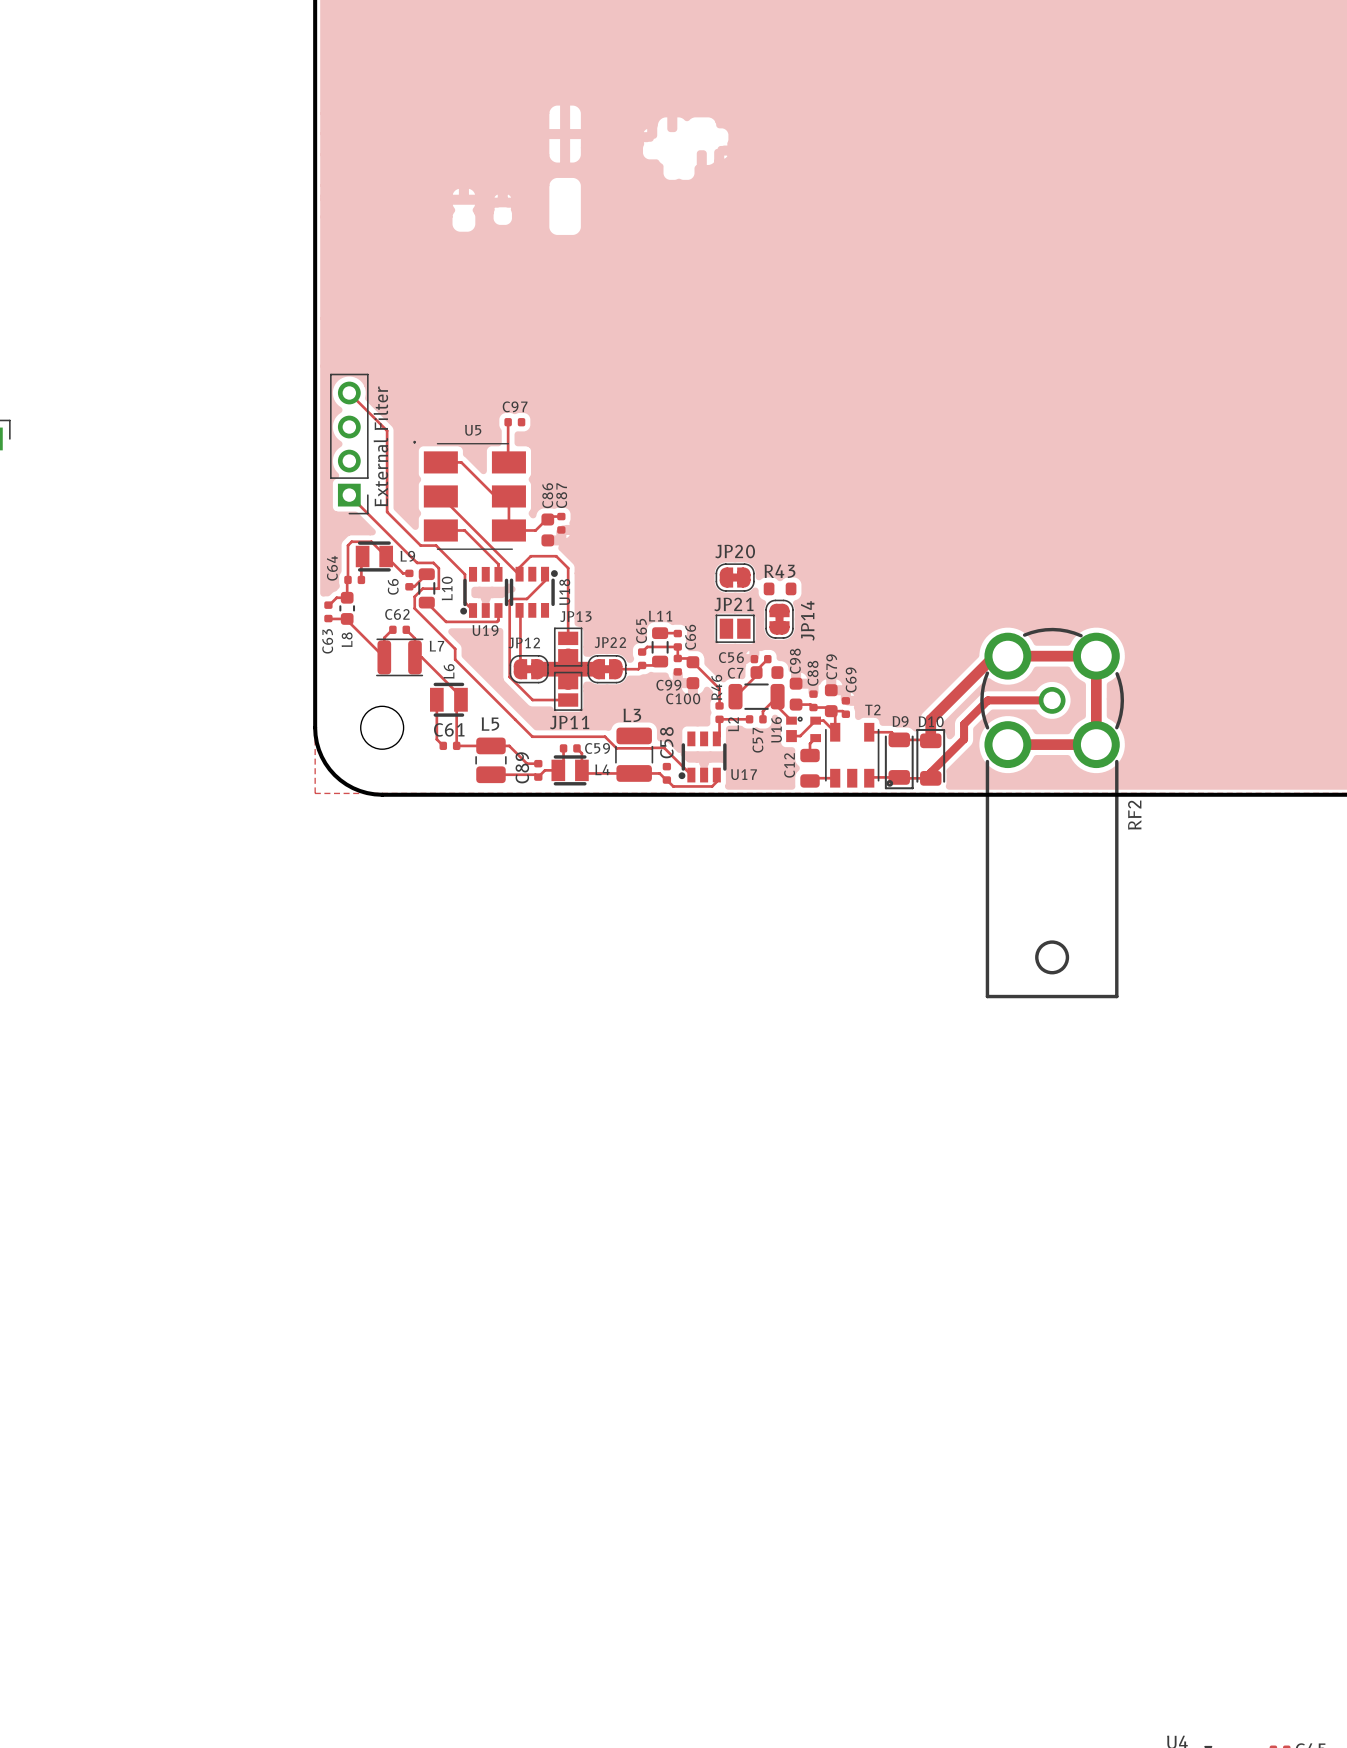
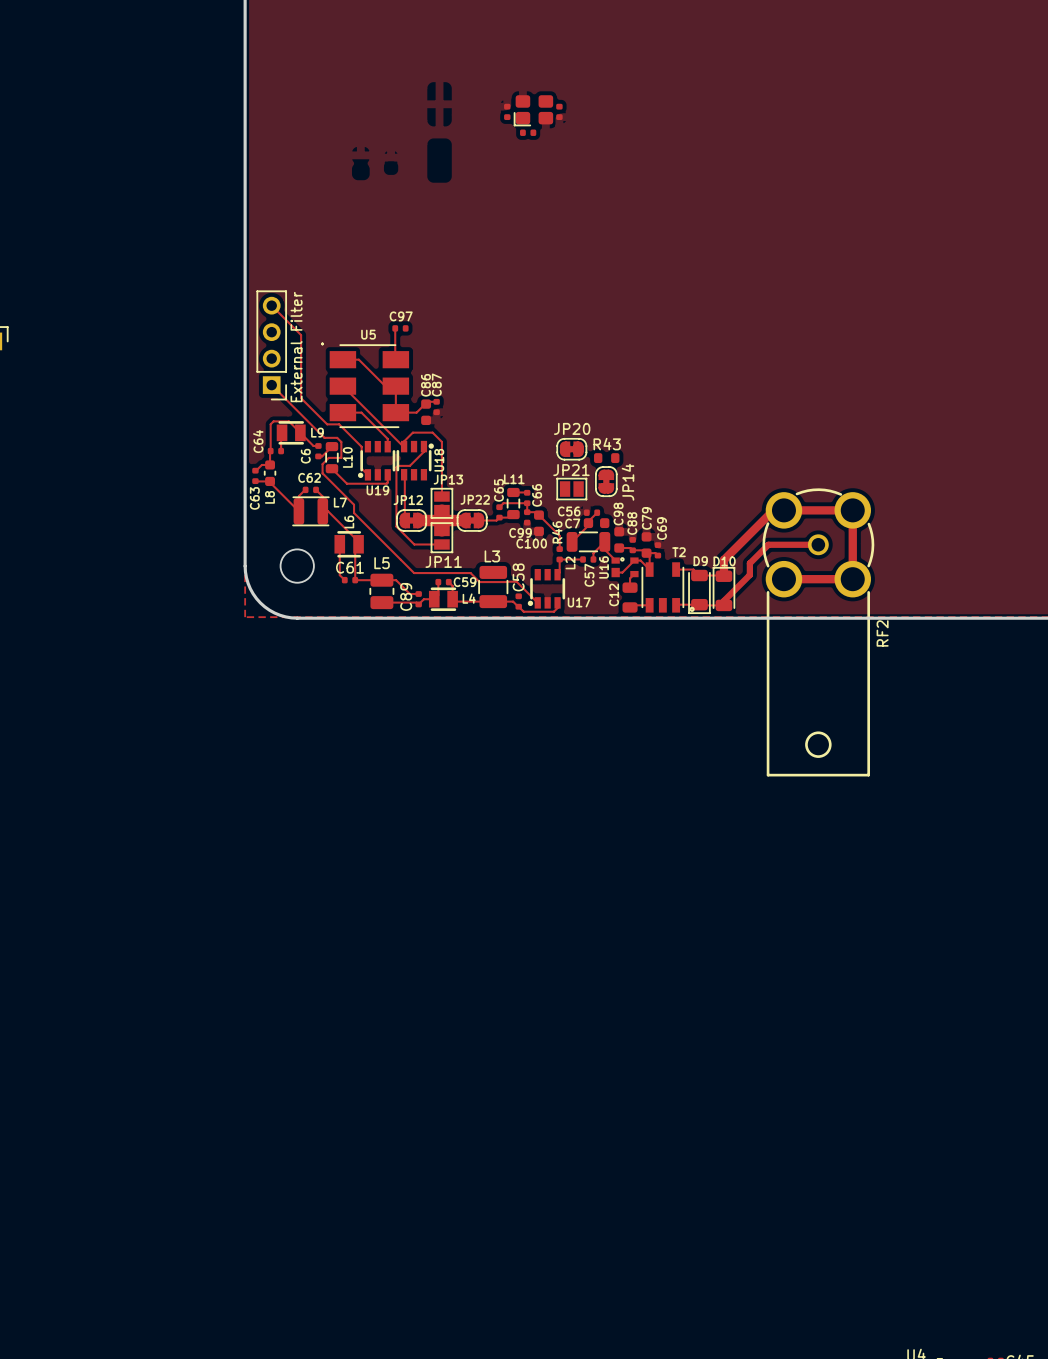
part: none -> (533, 110)
part: none -> (507, 111)
part: none -> (559, 111)
part: none -> (528, 132)

